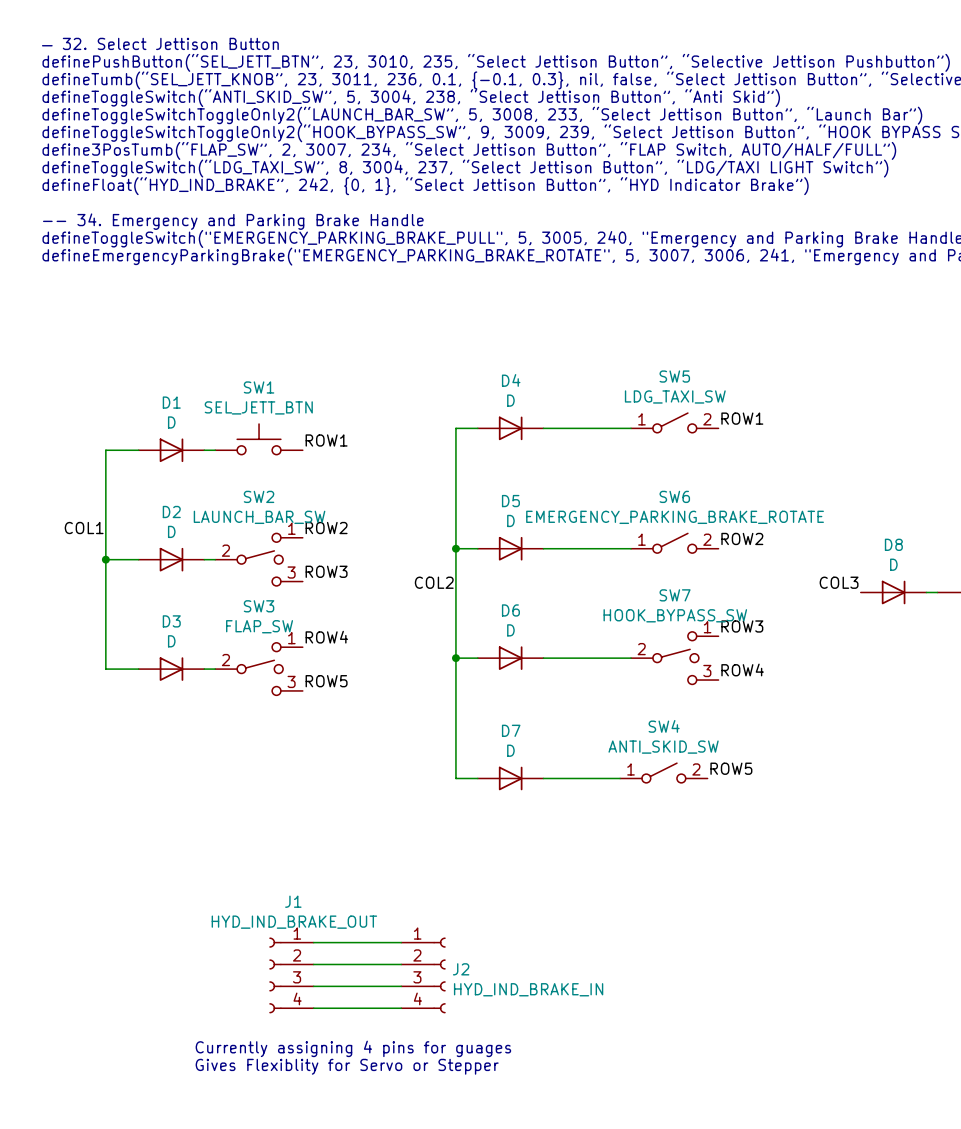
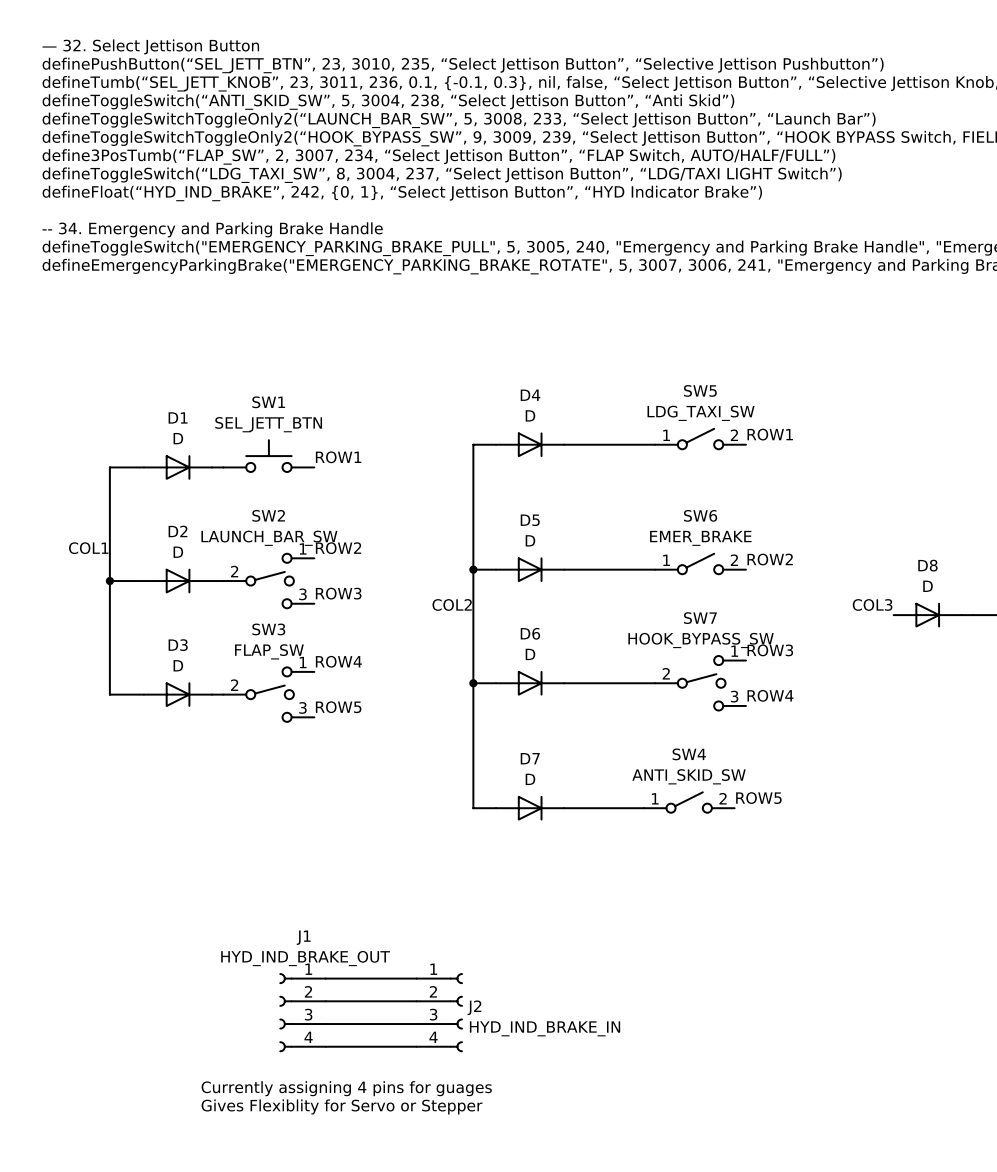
SW6 value: EMERGENCY_PARKING_BRAKE_ROTATE (675, 517) -> EMER_BRAKE (700, 538)

